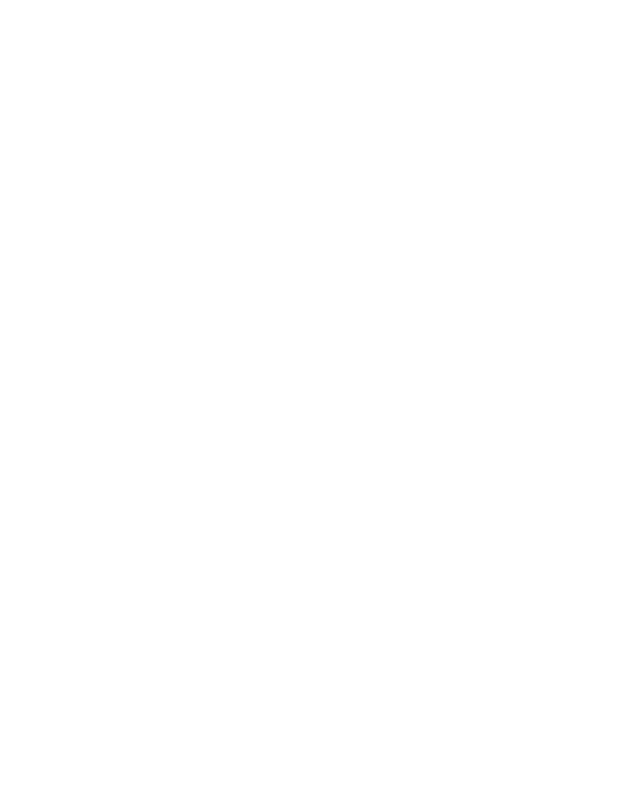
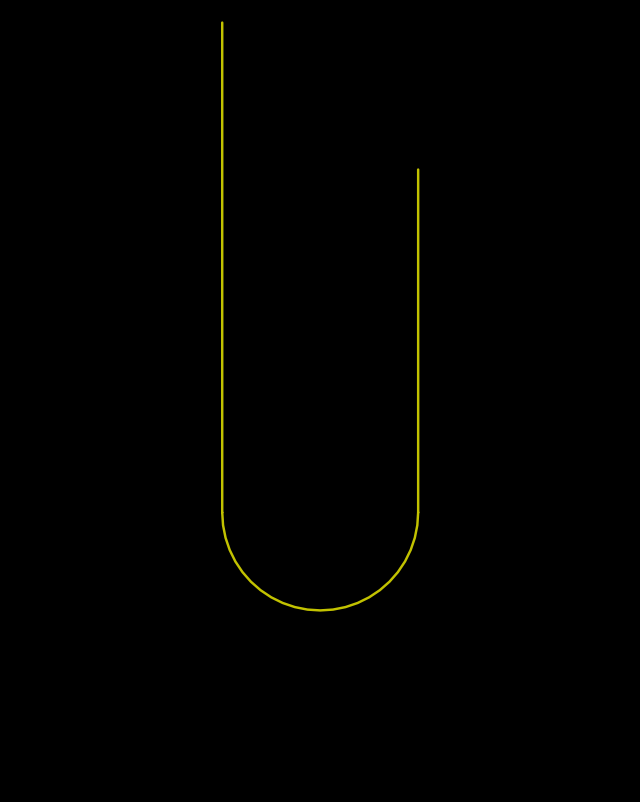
board edge: none -> (222, 22) (223, 525) (229, 549) (242, 572) (250, 581) (271, 597) (294, 607) (320, 610) (332, 609) (357, 602) (369, 597) (389, 581) (397, 572) (410, 549) (414, 537) (418, 512) (418, 169)

